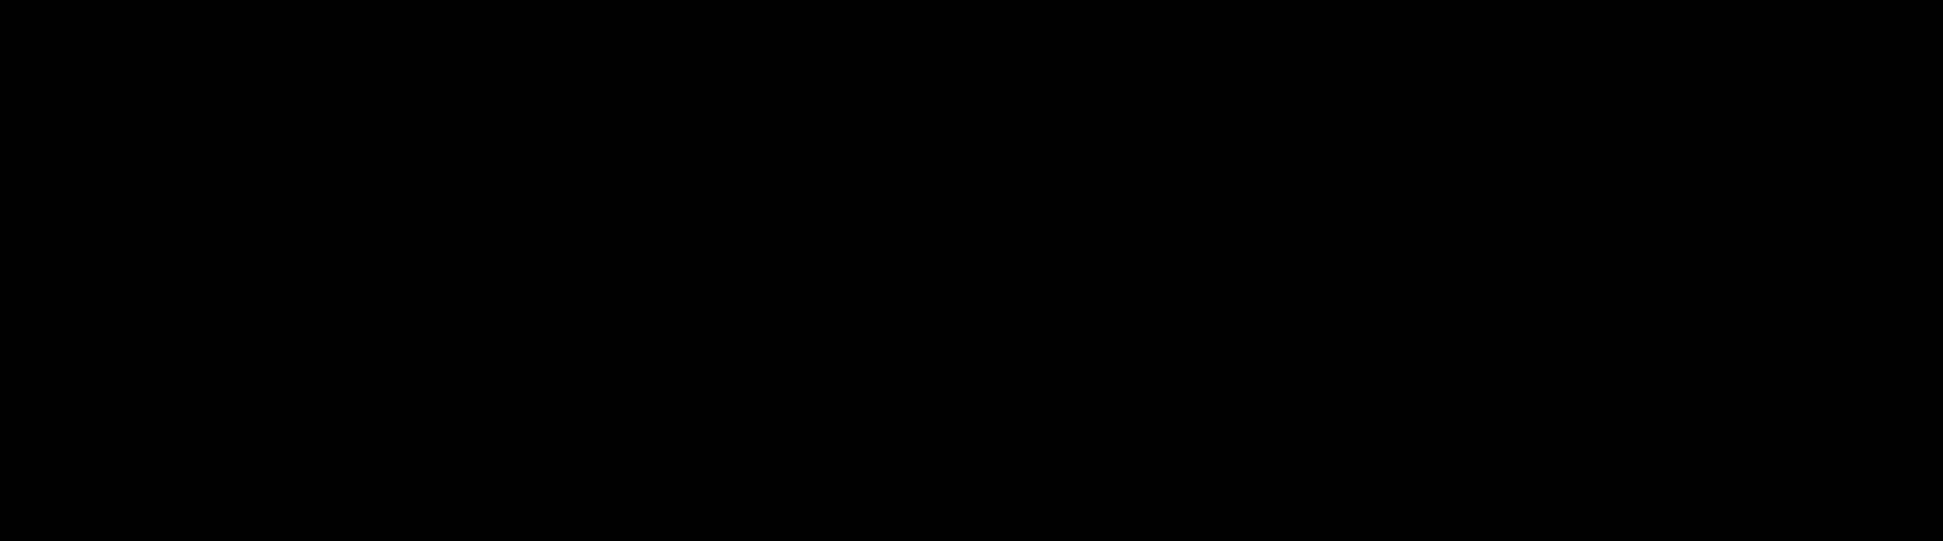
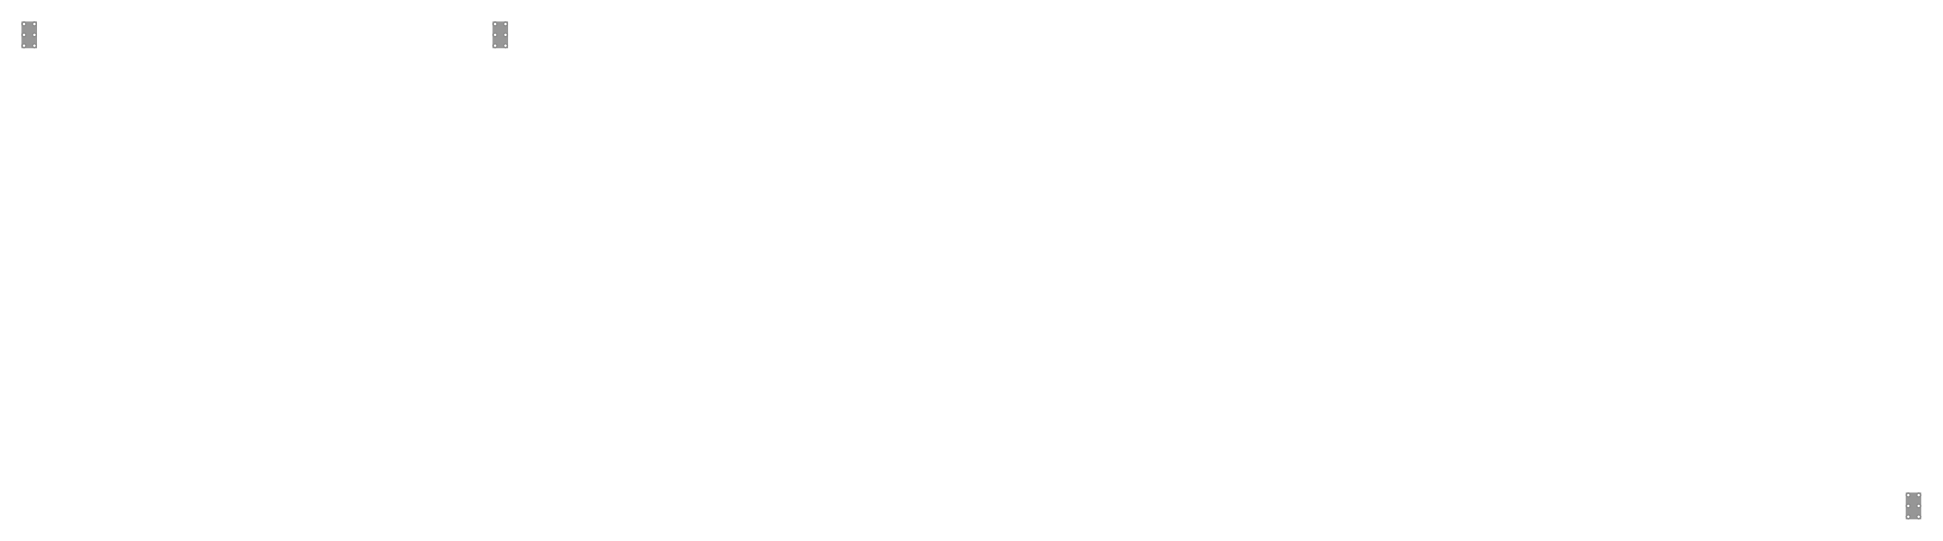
part: none -> (29, 34)
part: none -> (500, 34)
part: none -> (1913, 505)

